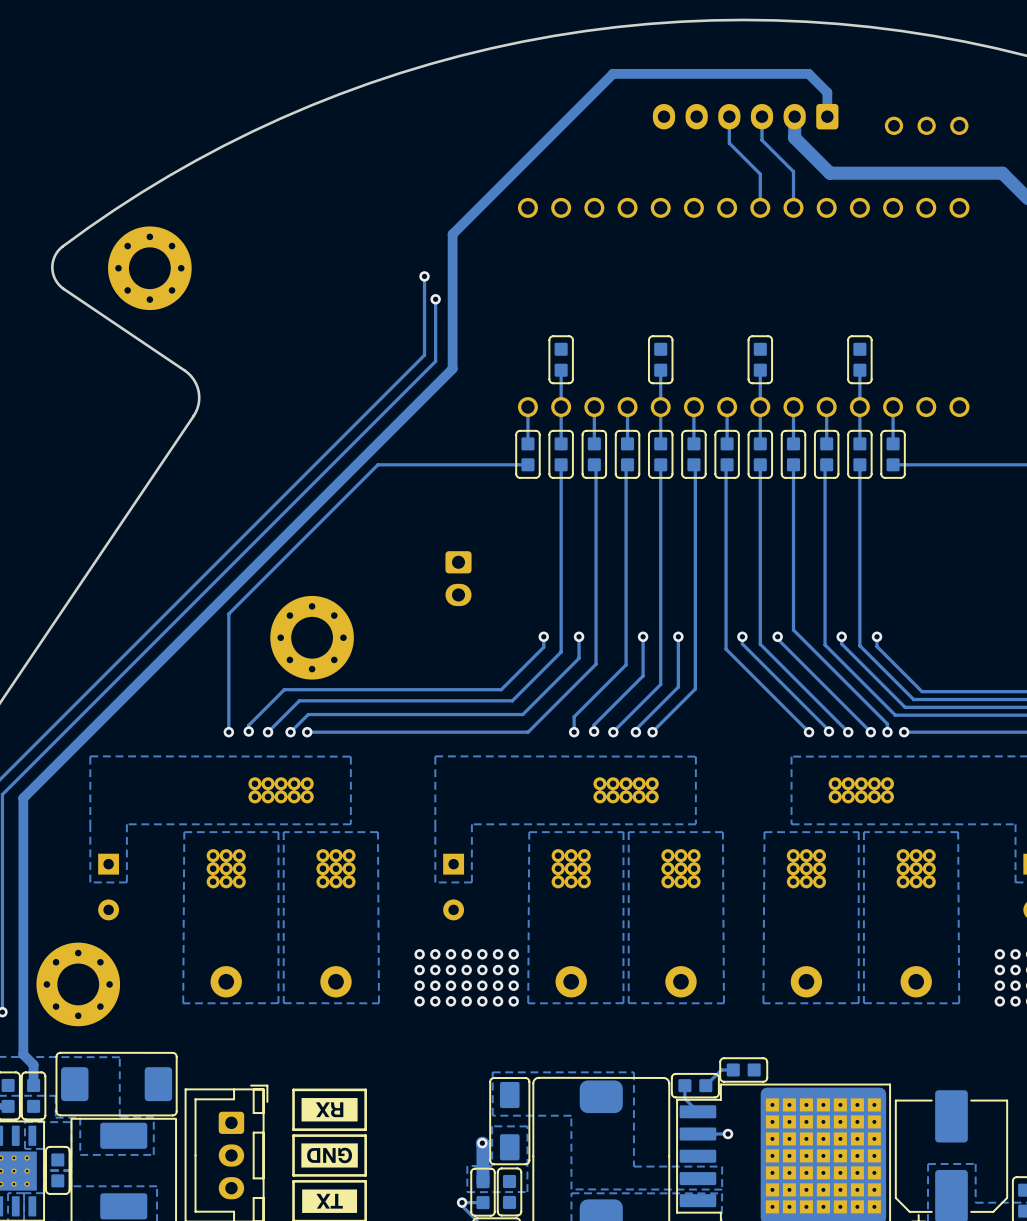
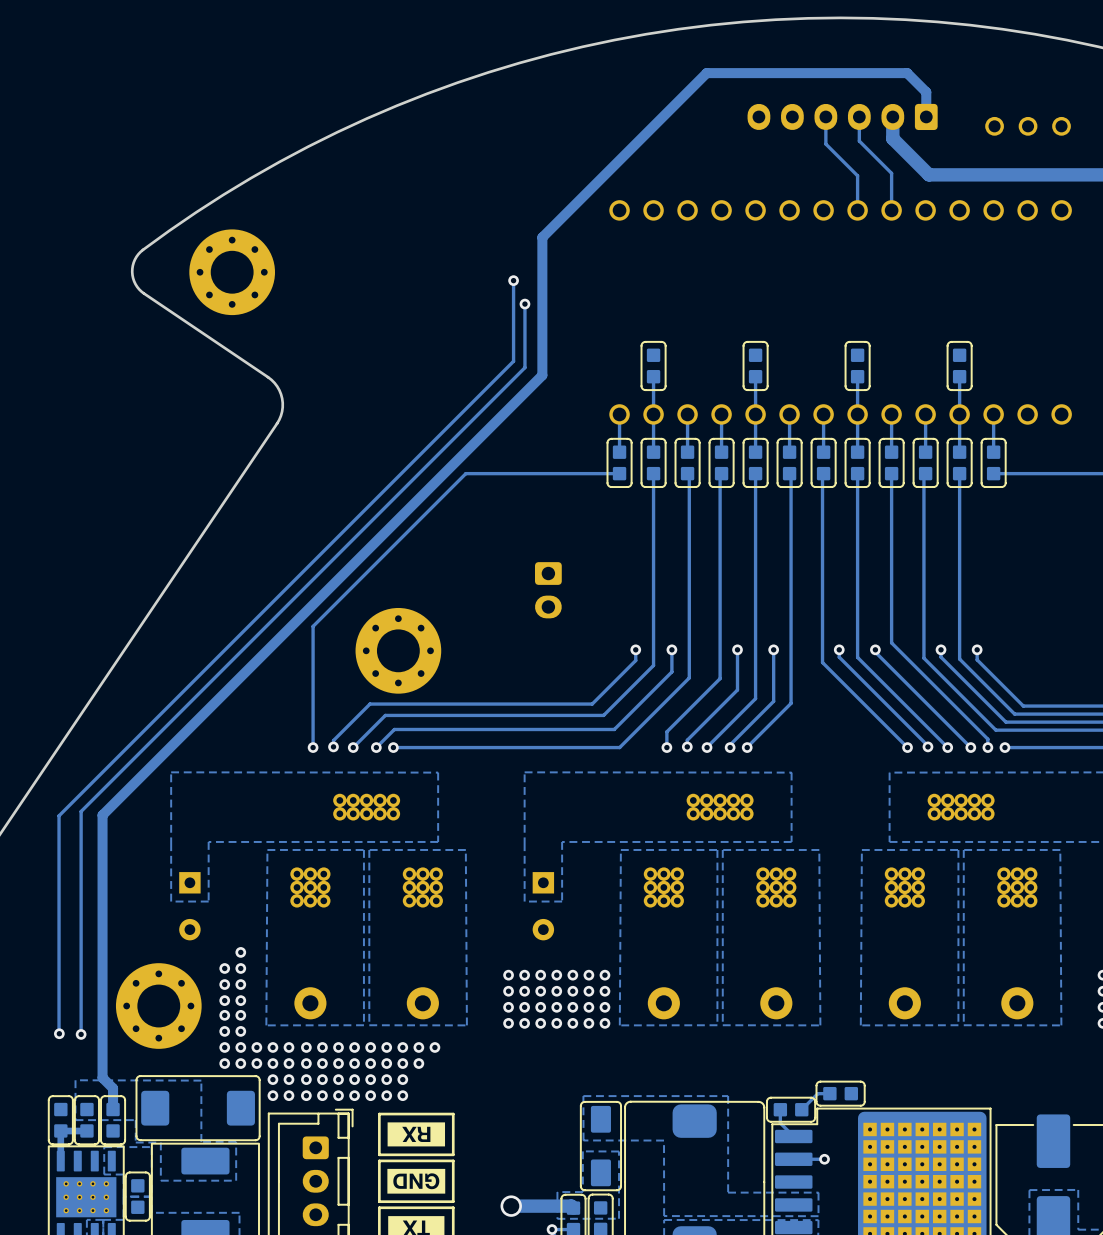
via: none -> (240, 952)
via: none -> (224, 968)
via: none -> (240, 968)
via: none -> (224, 984)
via: none -> (240, 984)
via: none -> (224, 1000)
via: none -> (240, 1000)
via: none -> (224, 1015)
via: none -> (240, 1015)
via: none -> (224, 1031)
via: none -> (240, 1031)
via: none -> (224, 1047)
via: none -> (240, 1047)
via: none -> (256, 1047)
via: none -> (272, 1047)
via: none -> (288, 1047)
via: none -> (306, 1047)
via: none -> (322, 1047)
via: none -> (338, 1047)
via: none -> (354, 1047)
via: none -> (370, 1047)
via: none -> (386, 1047)
via: none -> (402, 1047)
via: none -> (418, 1047)
via: none -> (434, 1047)
via: none -> (224, 1063)
via: none -> (240, 1063)
via: none -> (256, 1063)
via: none -> (272, 1063)
via: none -> (288, 1063)
via: none -> (306, 1063)
via: none -> (322, 1063)
via: none -> (338, 1063)
via: none -> (354, 1063)
via: none -> (370, 1063)
via: none -> (386, 1063)
via: none -> (402, 1063)
via: none -> (418, 1063)
via: none -> (272, 1079)
via: none -> (288, 1079)
via: none -> (306, 1079)
via: none -> (322, 1079)
via: none -> (338, 1079)
via: none -> (354, 1079)
via: none -> (370, 1079)
via: none -> (386, 1079)
via: none -> (402, 1079)
via: none -> (272, 1095)
via: none -> (288, 1095)
via: none -> (306, 1095)
via: none -> (322, 1095)
via: none -> (338, 1095)
via: none -> (354, 1095)
via: none -> (370, 1095)
via: none -> (386, 1095)
via: none -> (402, 1095)
track: (482, 1143) (483, 1181) -> (511, 1206) (571, 1206) (573, 1208)
via: (482, 1143) -> none
via: none -> (511, 1206)

